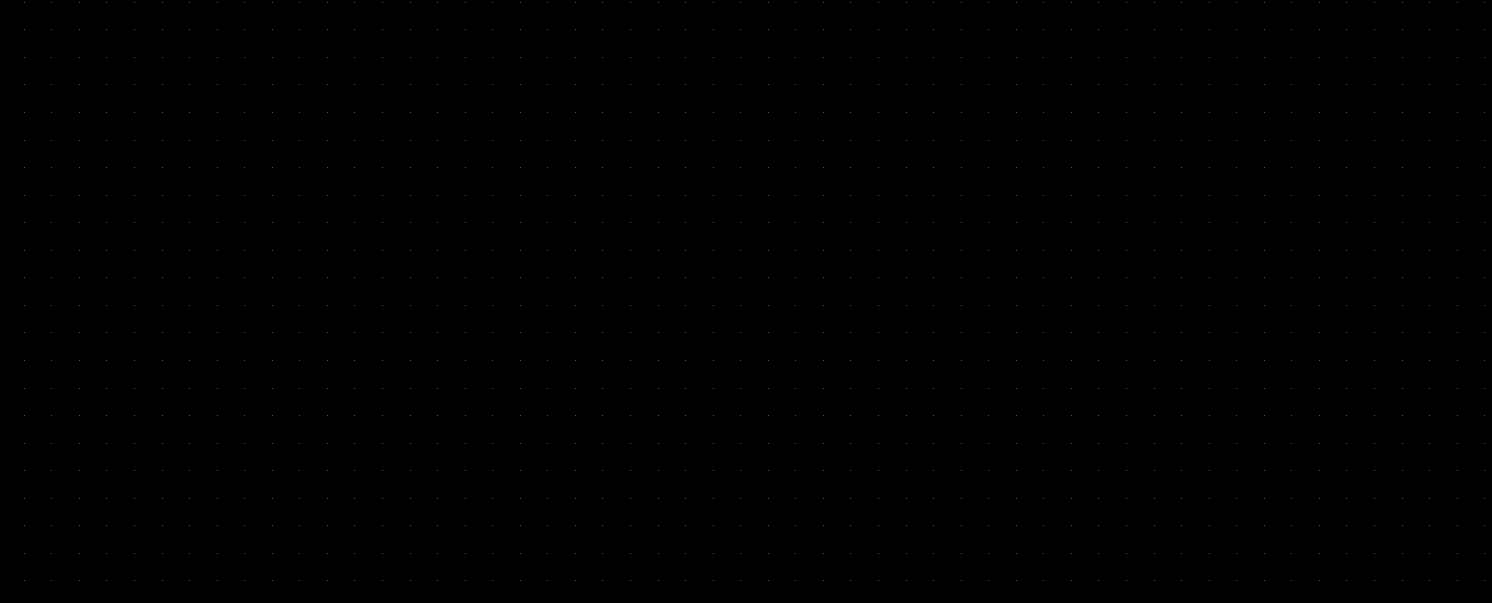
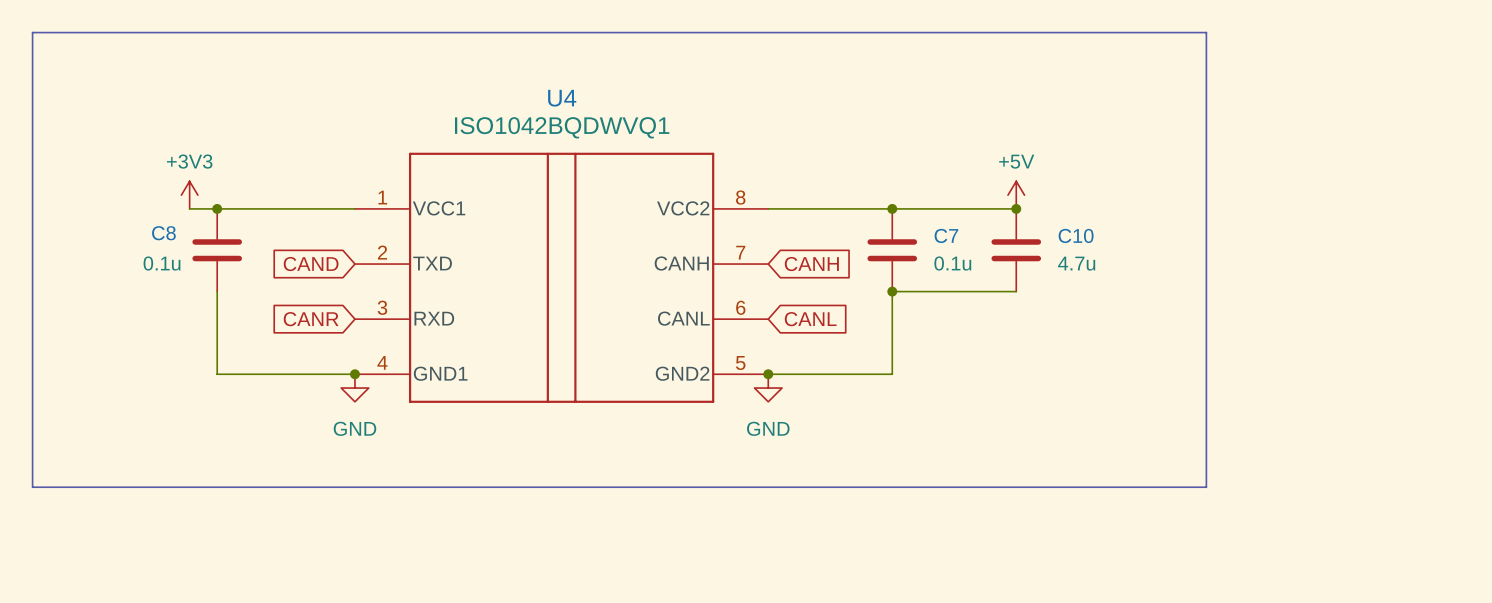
line: none -> (32, 32) (1206, 32) (1206, 487) (32, 487) (32, 32)
power symbol: none -> +3V3 (189, 195)
power symbol: none -> +5V (1016, 195)
wire: none -> (189, 208) (354, 208)
junction: none -> (217, 208)
wire: none -> (768, 208) (1016, 208)
junction: none -> (892, 208)
junction: none -> (1016, 208)
C8: none -> 0.1u (217, 250)
C7: none -> 0.1u (892, 250)
C10: none -> 4.7u (1016, 250)
global label: none -> CAND (311, 264)
global label: none -> CANH (811, 264)
U4: none -> ISO1042BQDWVQ1 (561, 277)
wire: none -> (217, 291) (217, 374) (354, 374)
junction: none -> (892, 291)
wire: none -> (1016, 291) (892, 291) (892, 374) (768, 374)
global label: none -> CANR (311, 319)
global label: none -> CANL (810, 319)
junction: none -> (354, 374)
junction: none -> (768, 374)
power symbol: none -> GND (354, 388)
power symbol: none -> GND (768, 388)

